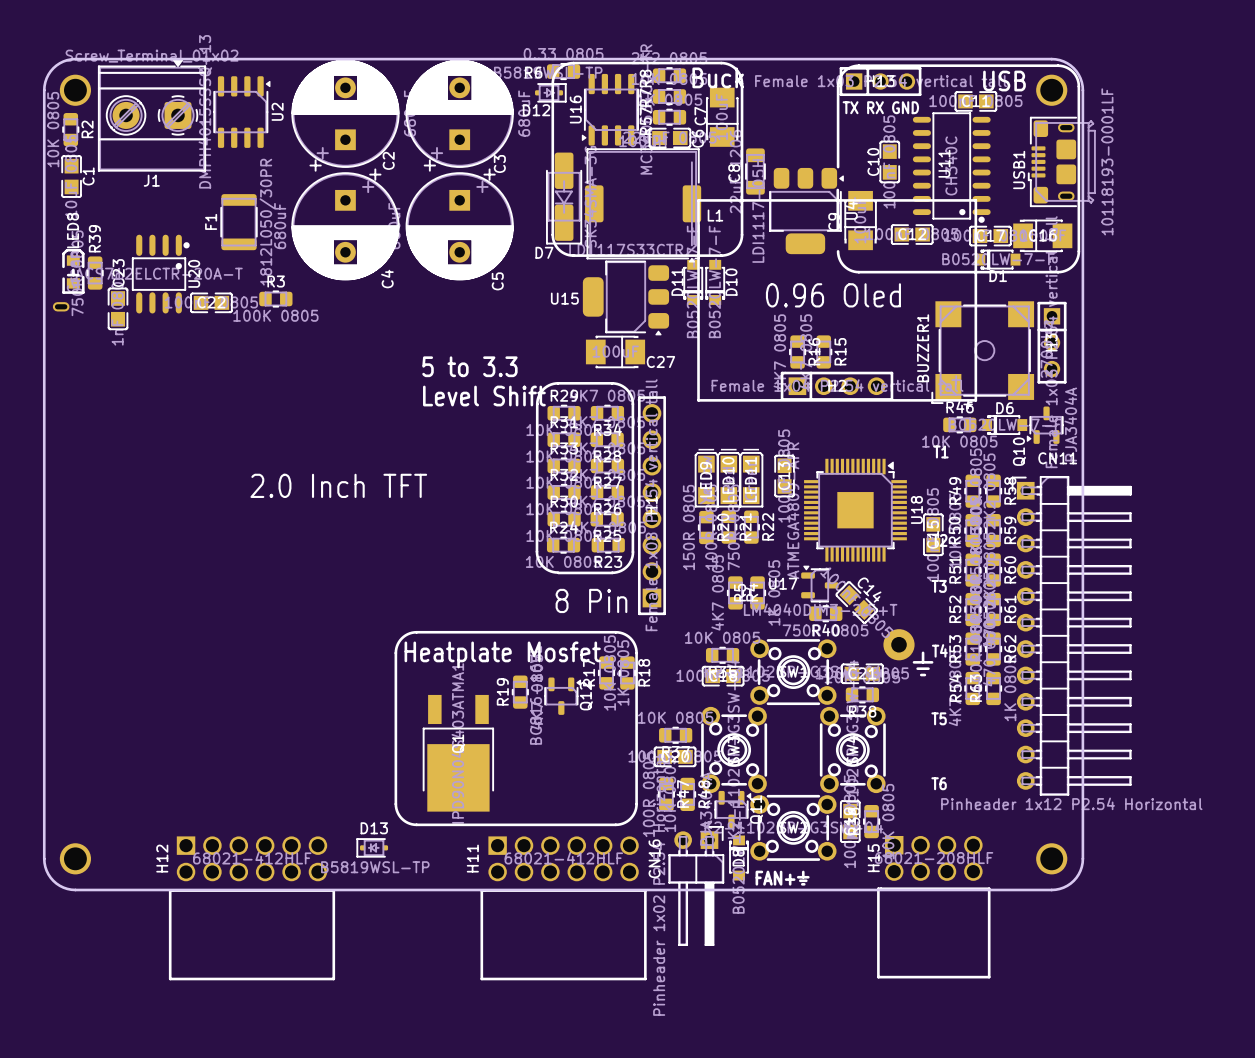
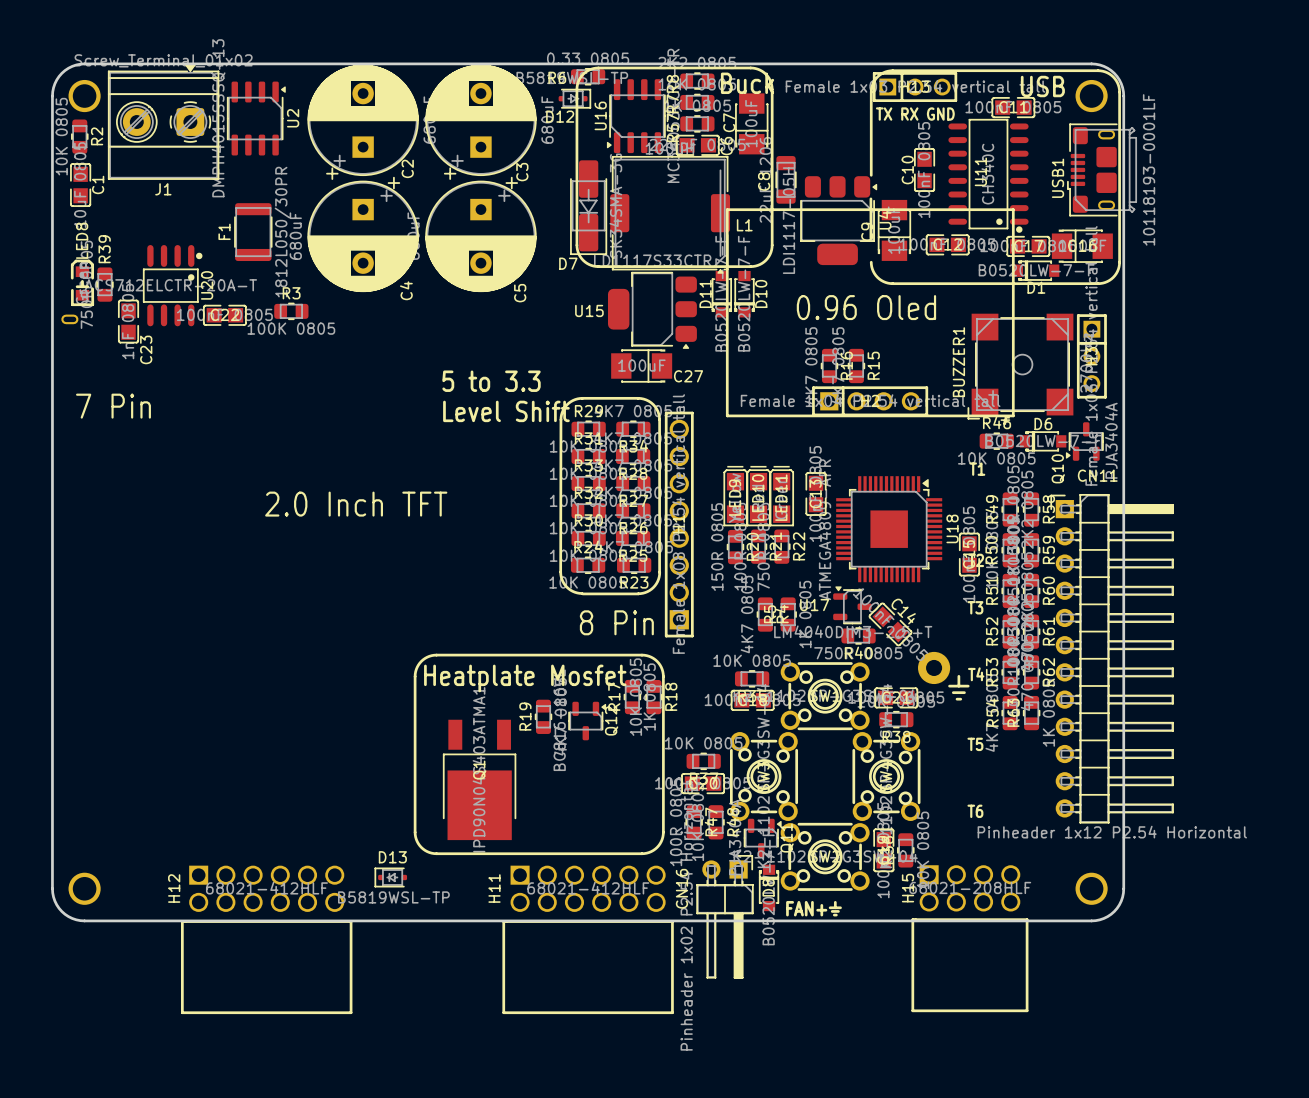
C23 name position: C23 (118, 273) -> C23 (146, 349)
text: none -> 7 Pin (113, 406)

